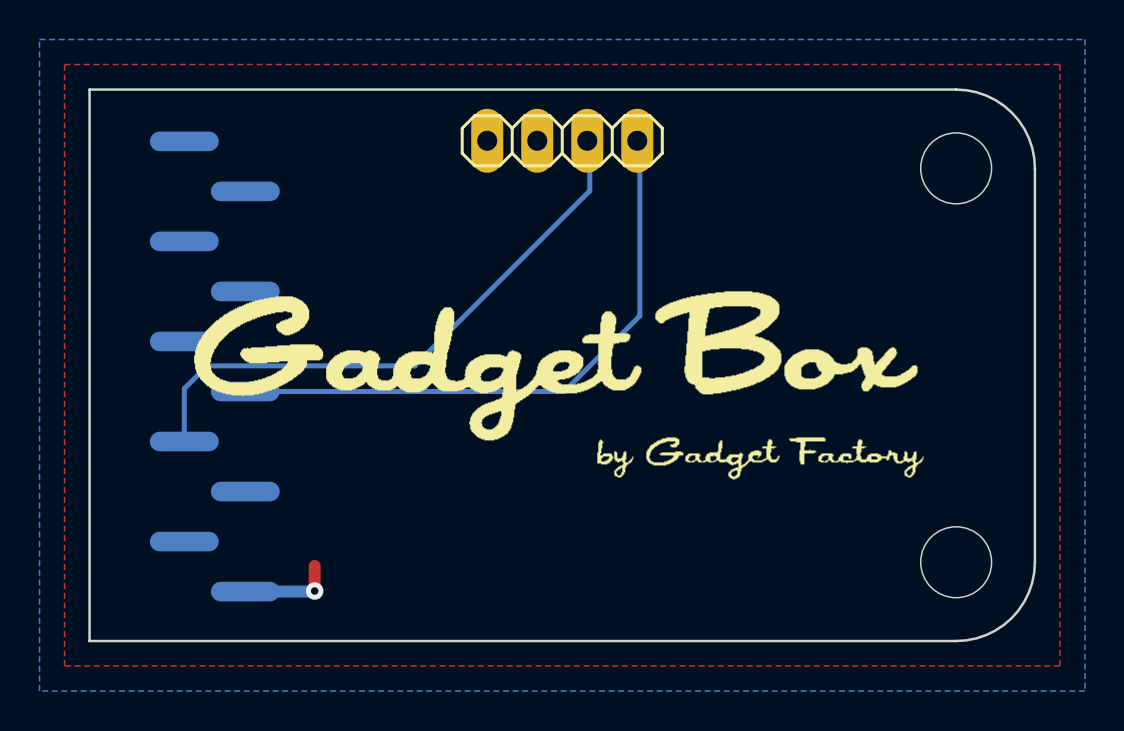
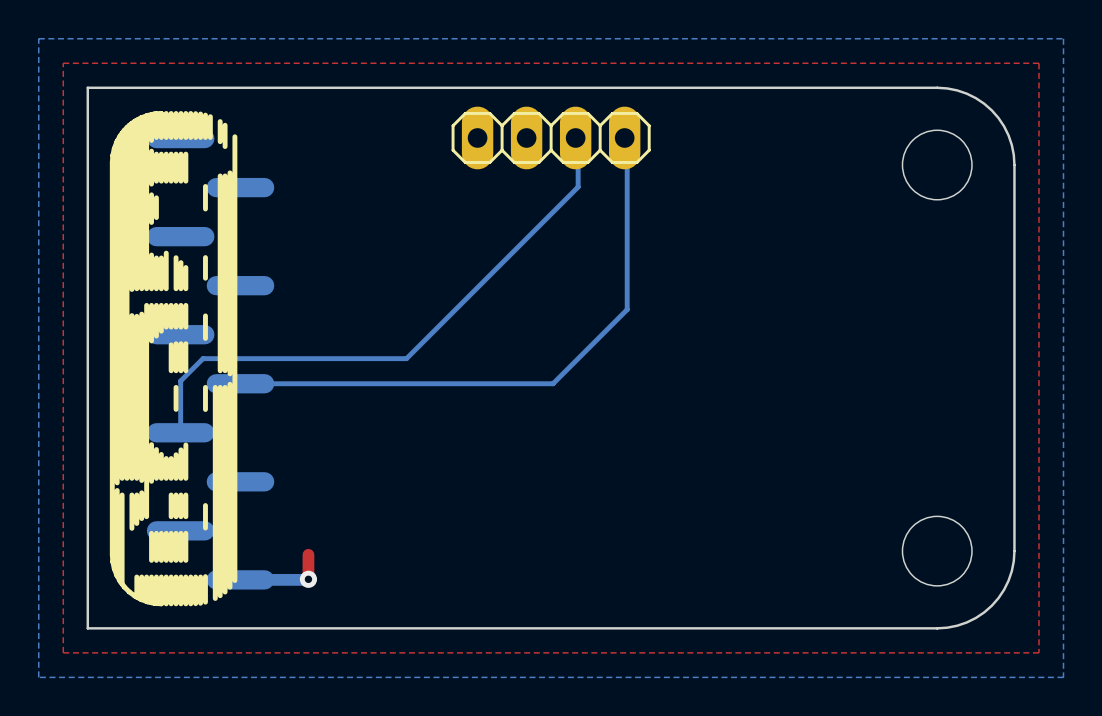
line: none -> (166, 113) (166, 137)
line: none -> (171, 113) (171, 137)
line: none -> (176, 113) (176, 137)
line: none -> (180, 113) (180, 137)
line: none -> (185, 113) (185, 137)
line: none -> (190, 113) (190, 137)
line: none -> (195, 113) (195, 137)
line: none -> (151, 114) (151, 140)
line: none -> (156, 113) (156, 137)
line: none -> (200, 114) (200, 137)
line: none -> (205, 115) (205, 137)
line: none -> (146, 115) (146, 288)
line: none -> (141, 117) (141, 288)
line: none -> (210, 116) (210, 137)
line: none -> (136, 120) (136, 288)
line: none -> (220, 121) (220, 141)
line: none -> (131, 123) (131, 289)
line: none -> (225, 125) (225, 146)
line: none -> (127, 127) (127, 478)
line: none -> (122, 133) (122, 478)
line: none -> (234, 136) (234, 580)
line: none -> (161, 137) (161, 113) (140, 117) (129, 125) (120, 135) (114, 148) (112, 162) (112, 561) (116, 575) (124, 586) (134, 596) (147, 601) (161, 603) (161, 577)
line: none -> (117, 141) (117, 482)
line: none -> (151, 151) (151, 184)
line: none -> (156, 154) (156, 181)
line: none -> (161, 154) (161, 181)
line: none -> (166, 154) (166, 181)
line: none -> (171, 154) (171, 181)
line: none -> (176, 154) (176, 181)
line: none -> (180, 154) (180, 181)
line: none -> (185, 154) (185, 181)
line: none -> (229, 172) (229, 373)
line: none -> (220, 175) (220, 370)
line: none -> (225, 175) (225, 370)
line: none -> (205, 186) (205, 208)
line: none -> (151, 194) (151, 222)
line: none -> (156, 197) (156, 217)
line: none -> (166, 253) (166, 288)
line: none -> (151, 255) (151, 288)
line: none -> (176, 257) (176, 288)
line: none -> (205, 257) (205, 278)
line: none -> (156, 257) (156, 288)
line: none -> (161, 257) (161, 288)
line: none -> (180, 262) (180, 288)
line: none -> (185, 267) (185, 288)
drawing: [194, 291, 924, 480] -> none
line: none -> (146, 305) (146, 516)
line: none -> (151, 305) (151, 340)
line: none -> (156, 305) (156, 336)
line: none -> (161, 305) (161, 331)
line: none -> (166, 305) (166, 327)
line: none -> (171, 305) (171, 327)
line: none -> (176, 305) (176, 327)
line: none -> (180, 305) (180, 327)
line: none -> (185, 305) (185, 327)
line: none -> (141, 314) (141, 480)
line: none -> (131, 315) (131, 478)
line: none -> (136, 316) (136, 478)
line: none -> (205, 315) (205, 338)
line: none -> (176, 343) (176, 370)
line: none -> (180, 343) (180, 370)
line: none -> (185, 343) (185, 370)
line: none -> (171, 344) (171, 370)
line: none -> (229, 384) (229, 587)
line: none -> (176, 387) (176, 409)
line: none -> (205, 387) (205, 409)
line: none -> (215, 387) (215, 598)
line: none -> (220, 387) (220, 595)
line: none -> (225, 387) (225, 592)
line: none -> (151, 444) (151, 481)
line: none -> (185, 444) (185, 478)
line: none -> (156, 449) (156, 478)
line: none -> (180, 449) (180, 478)
line: none -> (161, 454) (161, 478)
line: none -> (176, 454) (176, 478)
line: none -> (166, 458) (166, 478)
line: none -> (171, 458) (171, 478)
line: none -> (117, 490) (117, 576)
line: none -> (141, 492) (141, 518)
line: none -> (122, 495) (122, 584)
line: none -> (131, 495) (131, 528)
line: none -> (136, 495) (136, 523)
line: none -> (171, 495) (171, 516)
line: none -> (176, 495) (176, 516)
line: none -> (180, 495) (180, 516)
line: none -> (185, 495) (185, 516)
line: none -> (205, 505) (205, 528)
line: none -> (151, 533) (151, 560)
line: none -> (156, 533) (156, 560)
line: none -> (161, 533) (161, 560)
line: none -> (166, 533) (166, 560)
line: none -> (171, 533) (171, 560)
line: none -> (176, 533) (176, 560)
line: none -> (180, 533) (180, 560)
line: none -> (185, 533) (185, 560)
line: none -> (136, 577) (136, 597)
line: none -> (141, 577) (141, 599)
line: none -> (146, 577) (146, 601)
line: none -> (151, 577) (151, 602)
line: none -> (156, 577) (156, 603)
line: none -> (166, 577) (166, 603)
line: none -> (171, 577) (171, 603)
line: none -> (176, 577) (176, 603)
line: none -> (180, 577) (180, 603)
line: none -> (185, 577) (185, 603)
line: none -> (190, 577) (190, 603)
line: none -> (195, 577) (195, 603)
line: none -> (200, 577) (200, 603)
line: none -> (205, 576) (205, 602)

